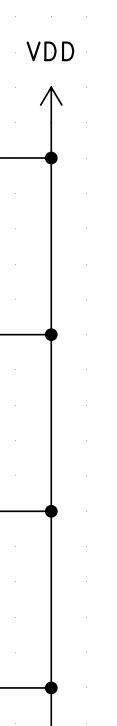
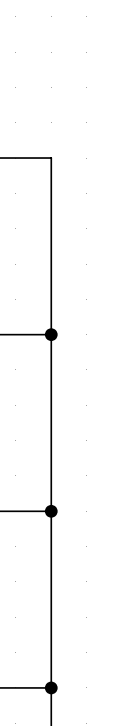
power symbol: VDD (51, 105) -> none
wire: (51, 122) (51, 158) -> none
junction: (51, 158) -> none

